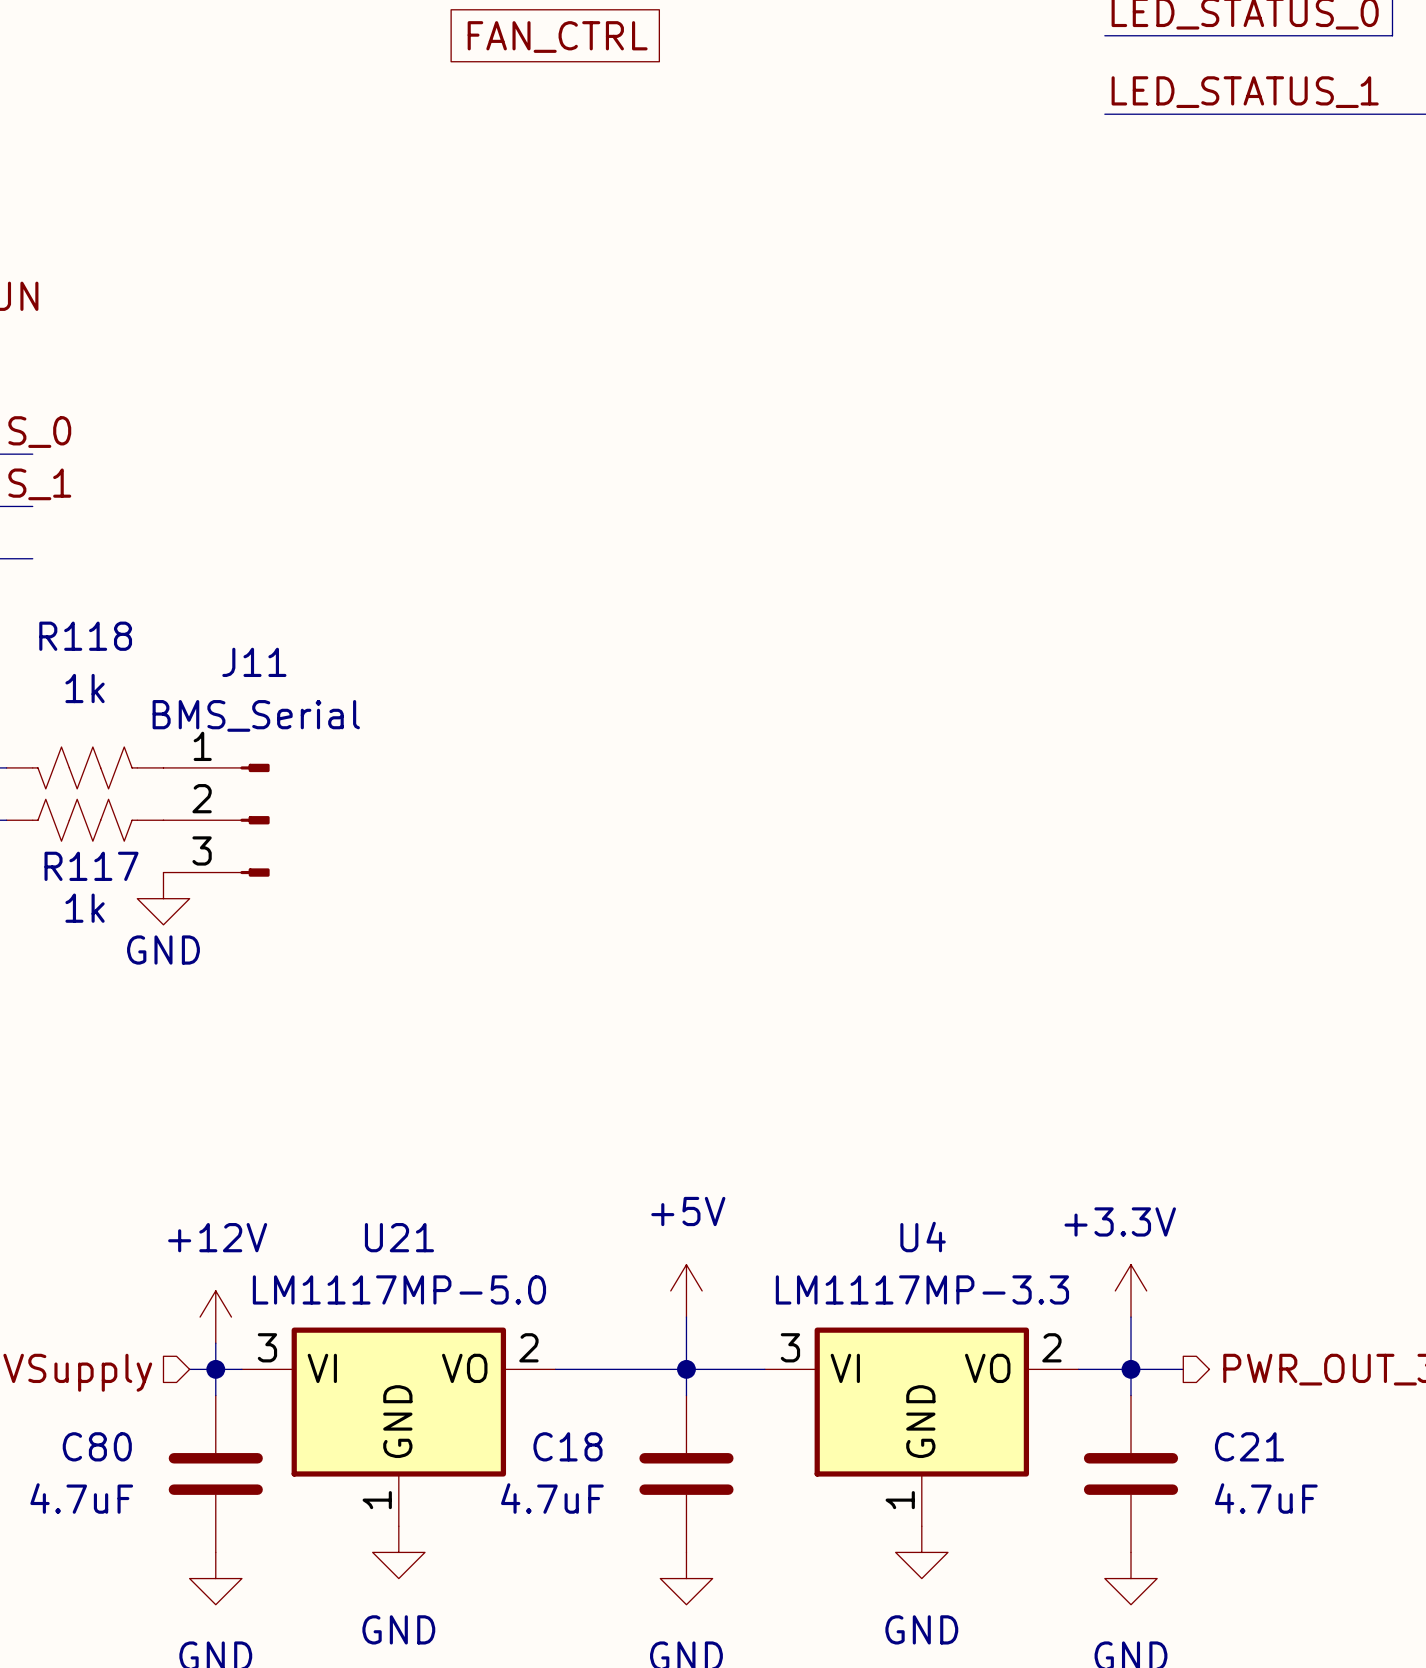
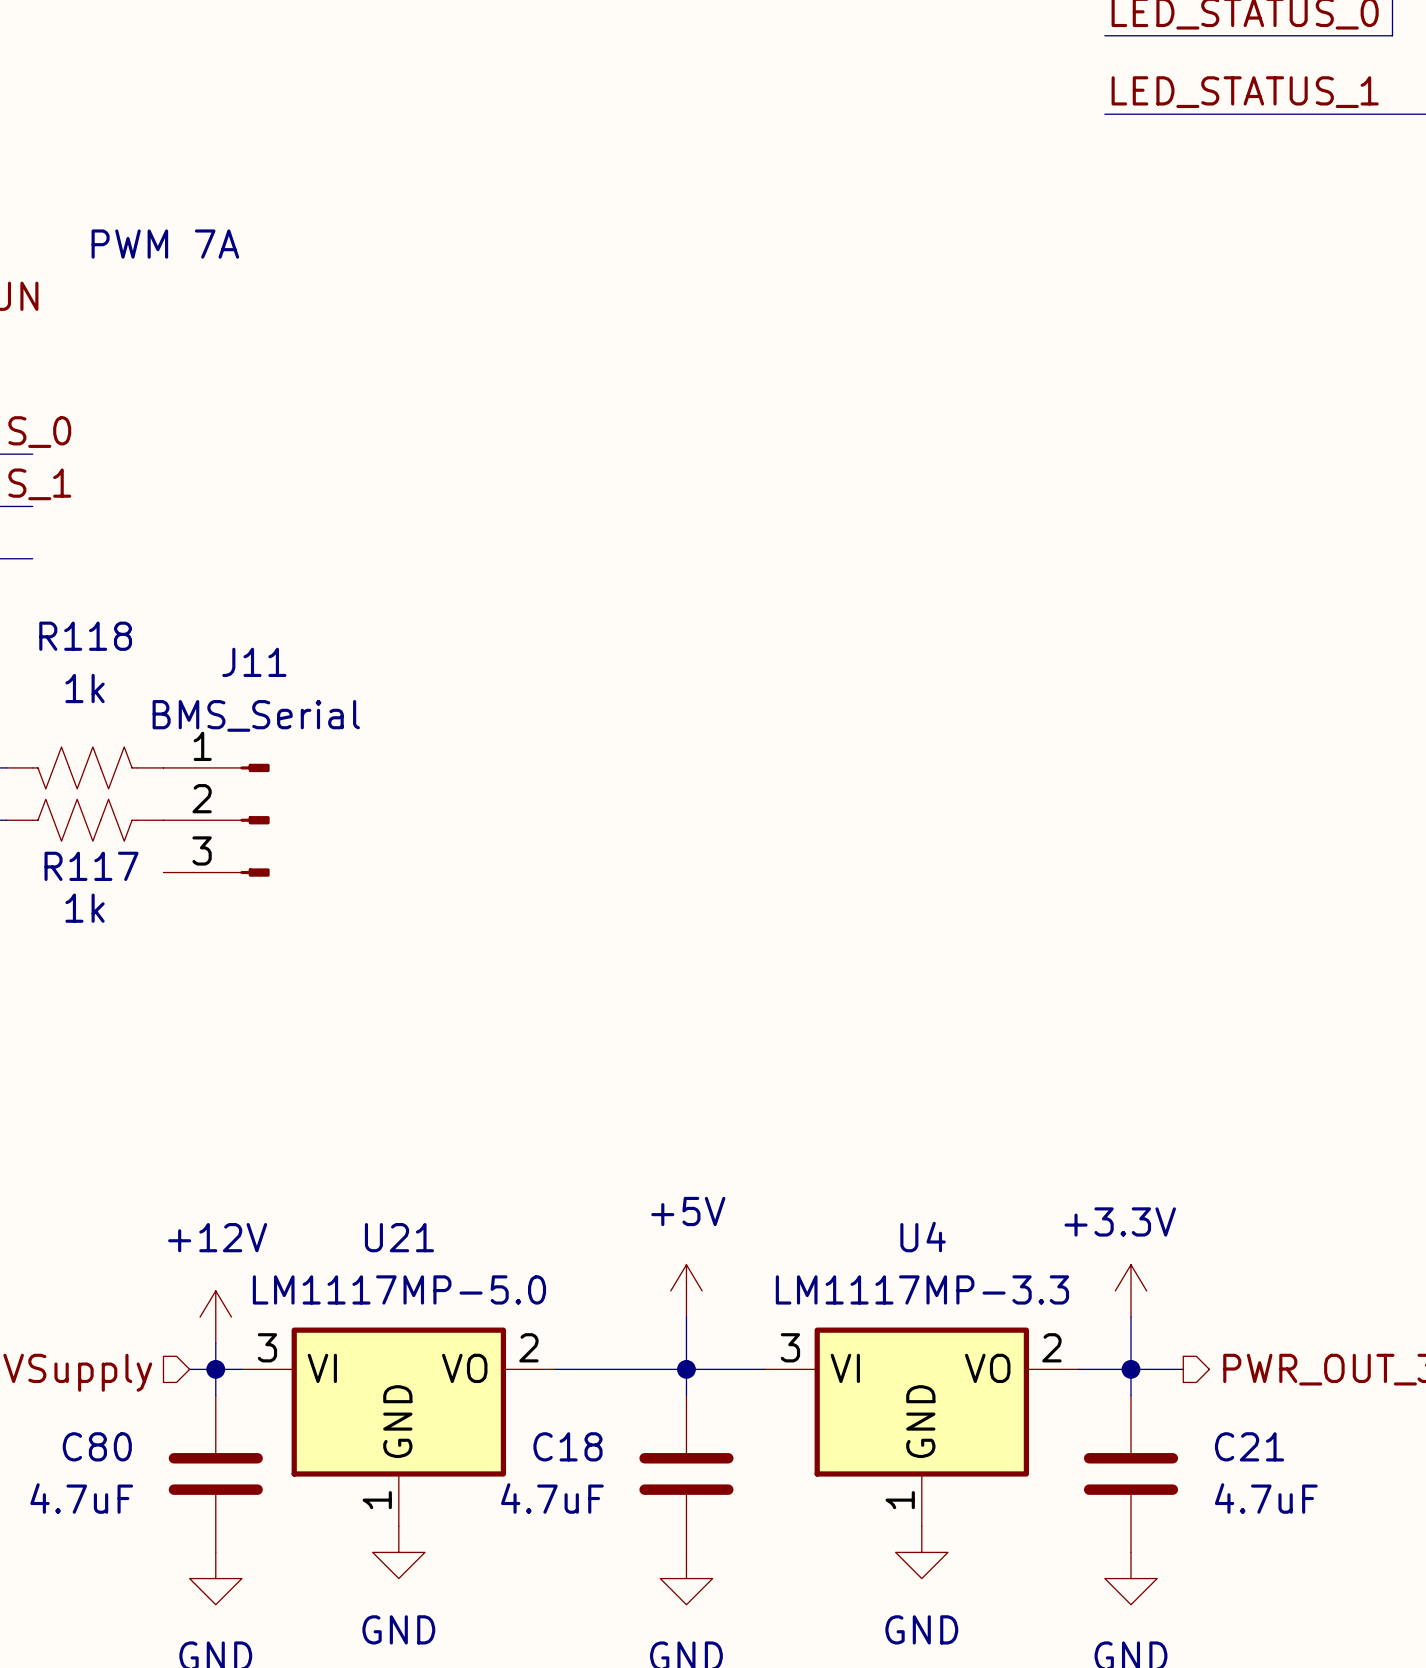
global label: FAN_CTRL (557, 37) -> none
text: none -> PWM 7A (165, 244)
power symbol: GND (163, 898) -> none

